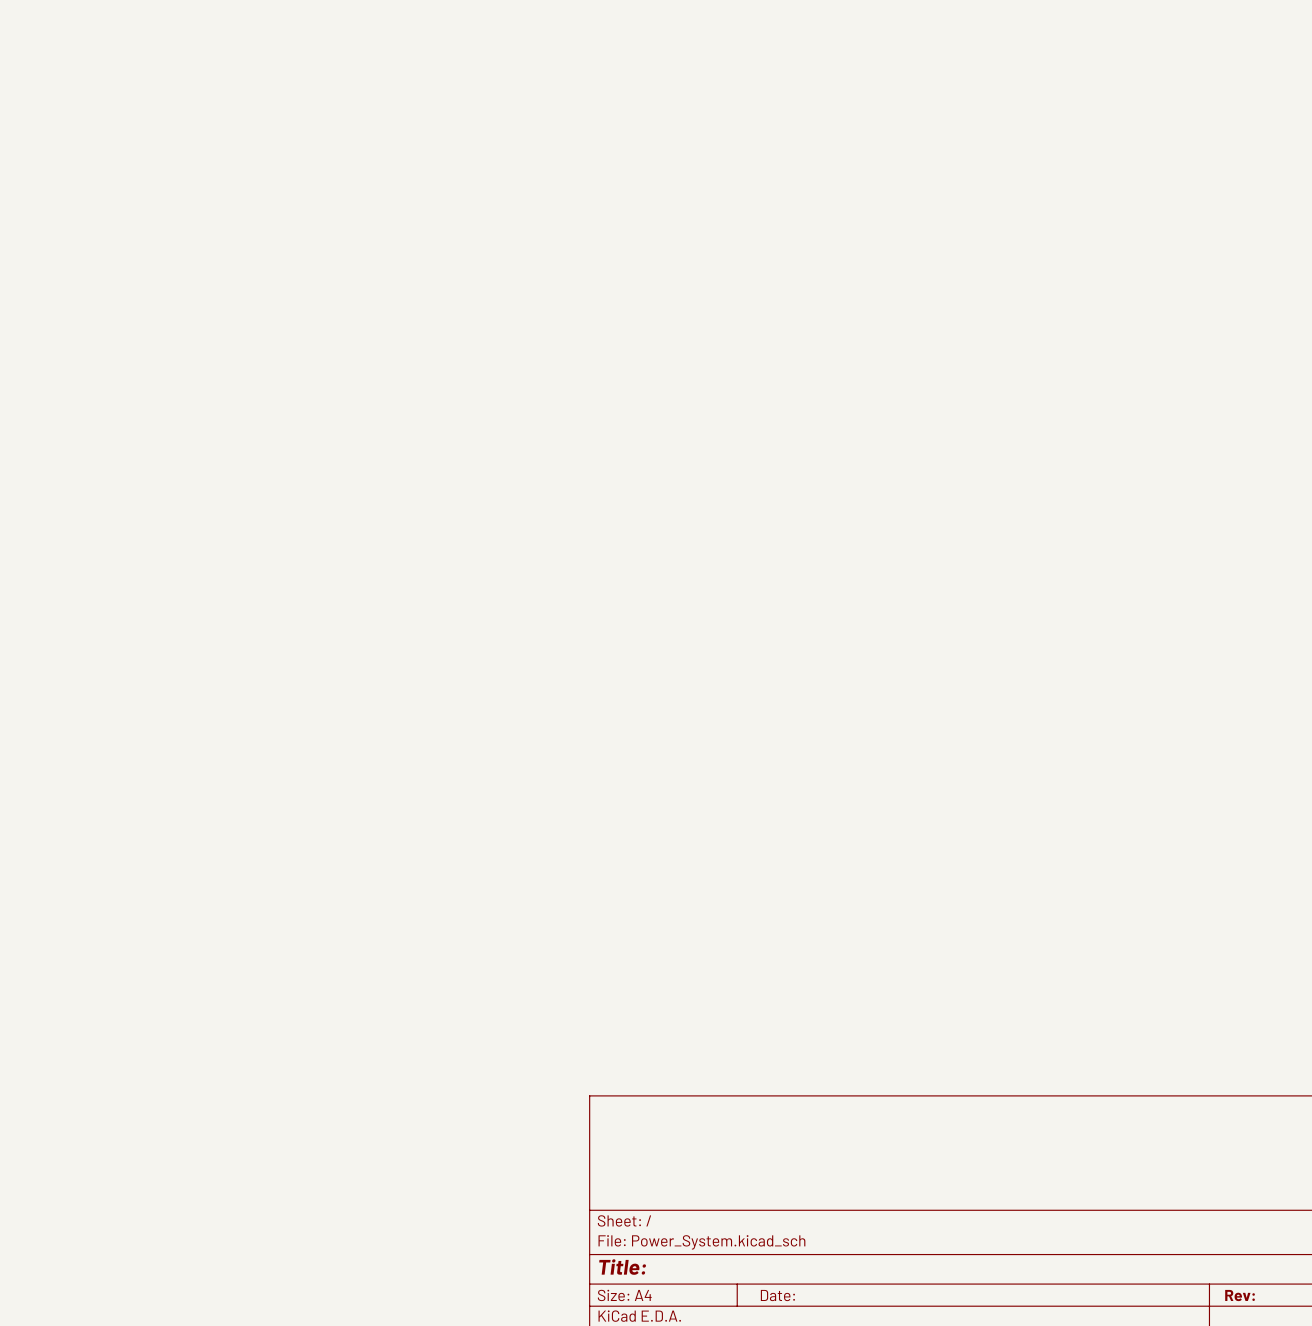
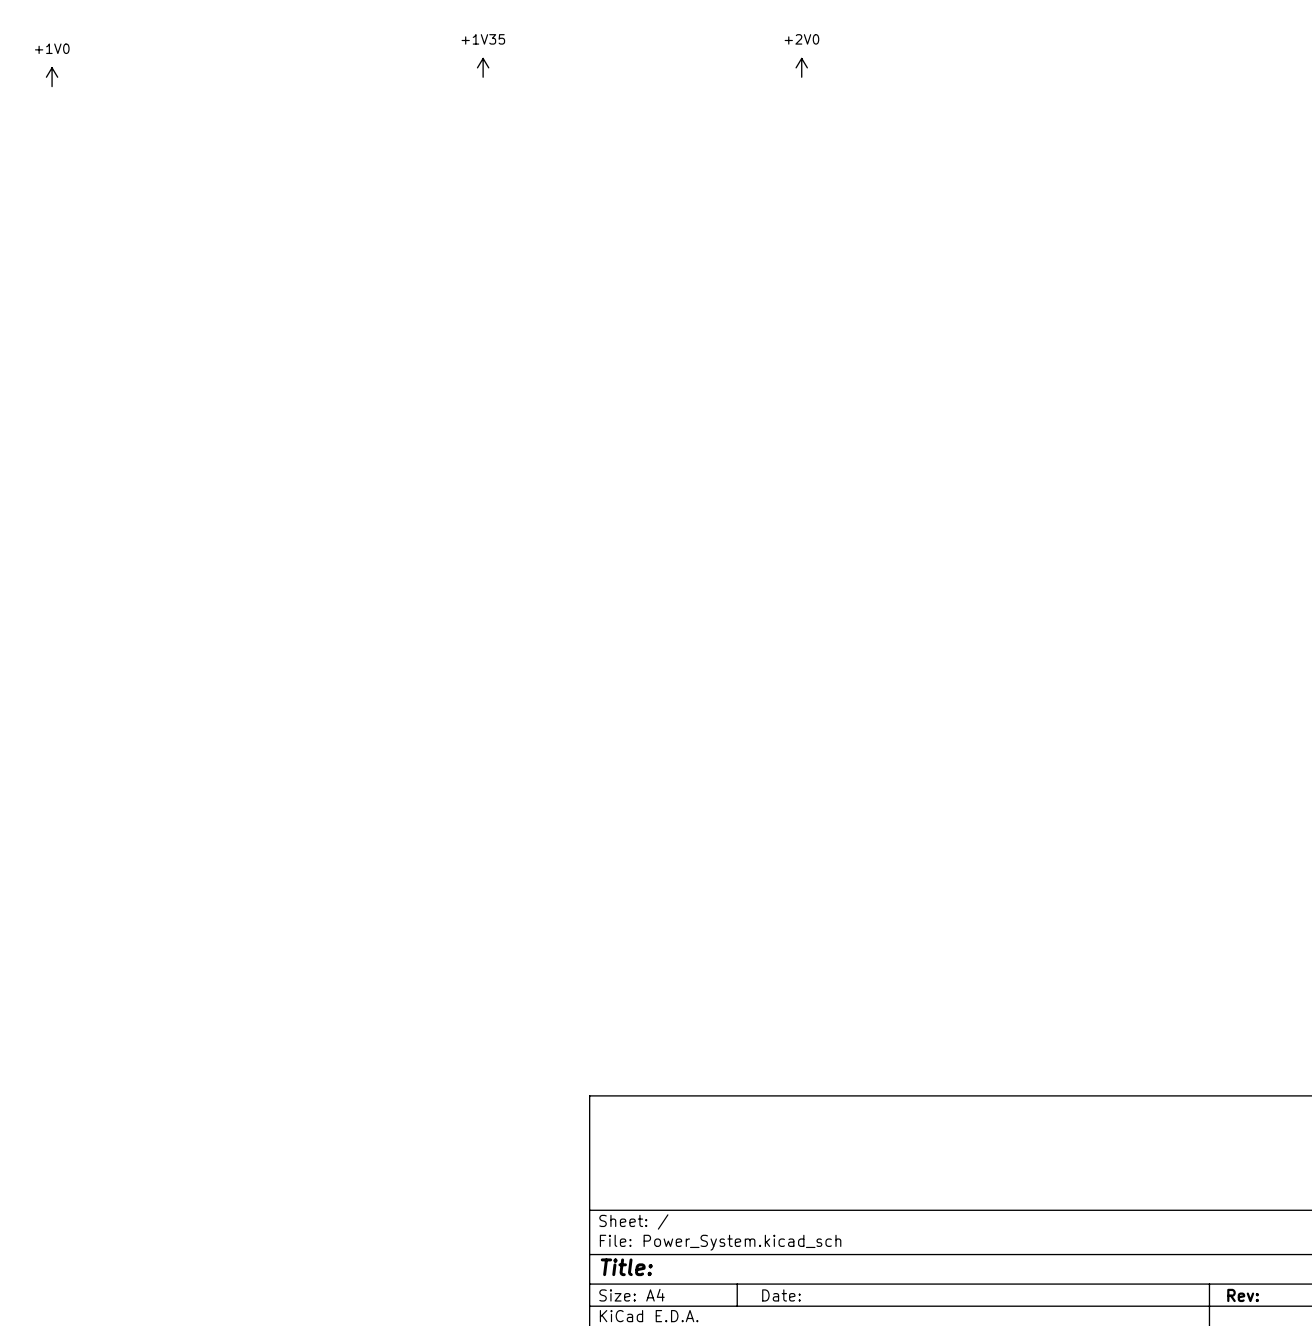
power symbol: none -> +1V35 (483, 67)
power symbol: none -> +2V0 (801, 67)
power symbol: none -> +1V0 (52, 77)

